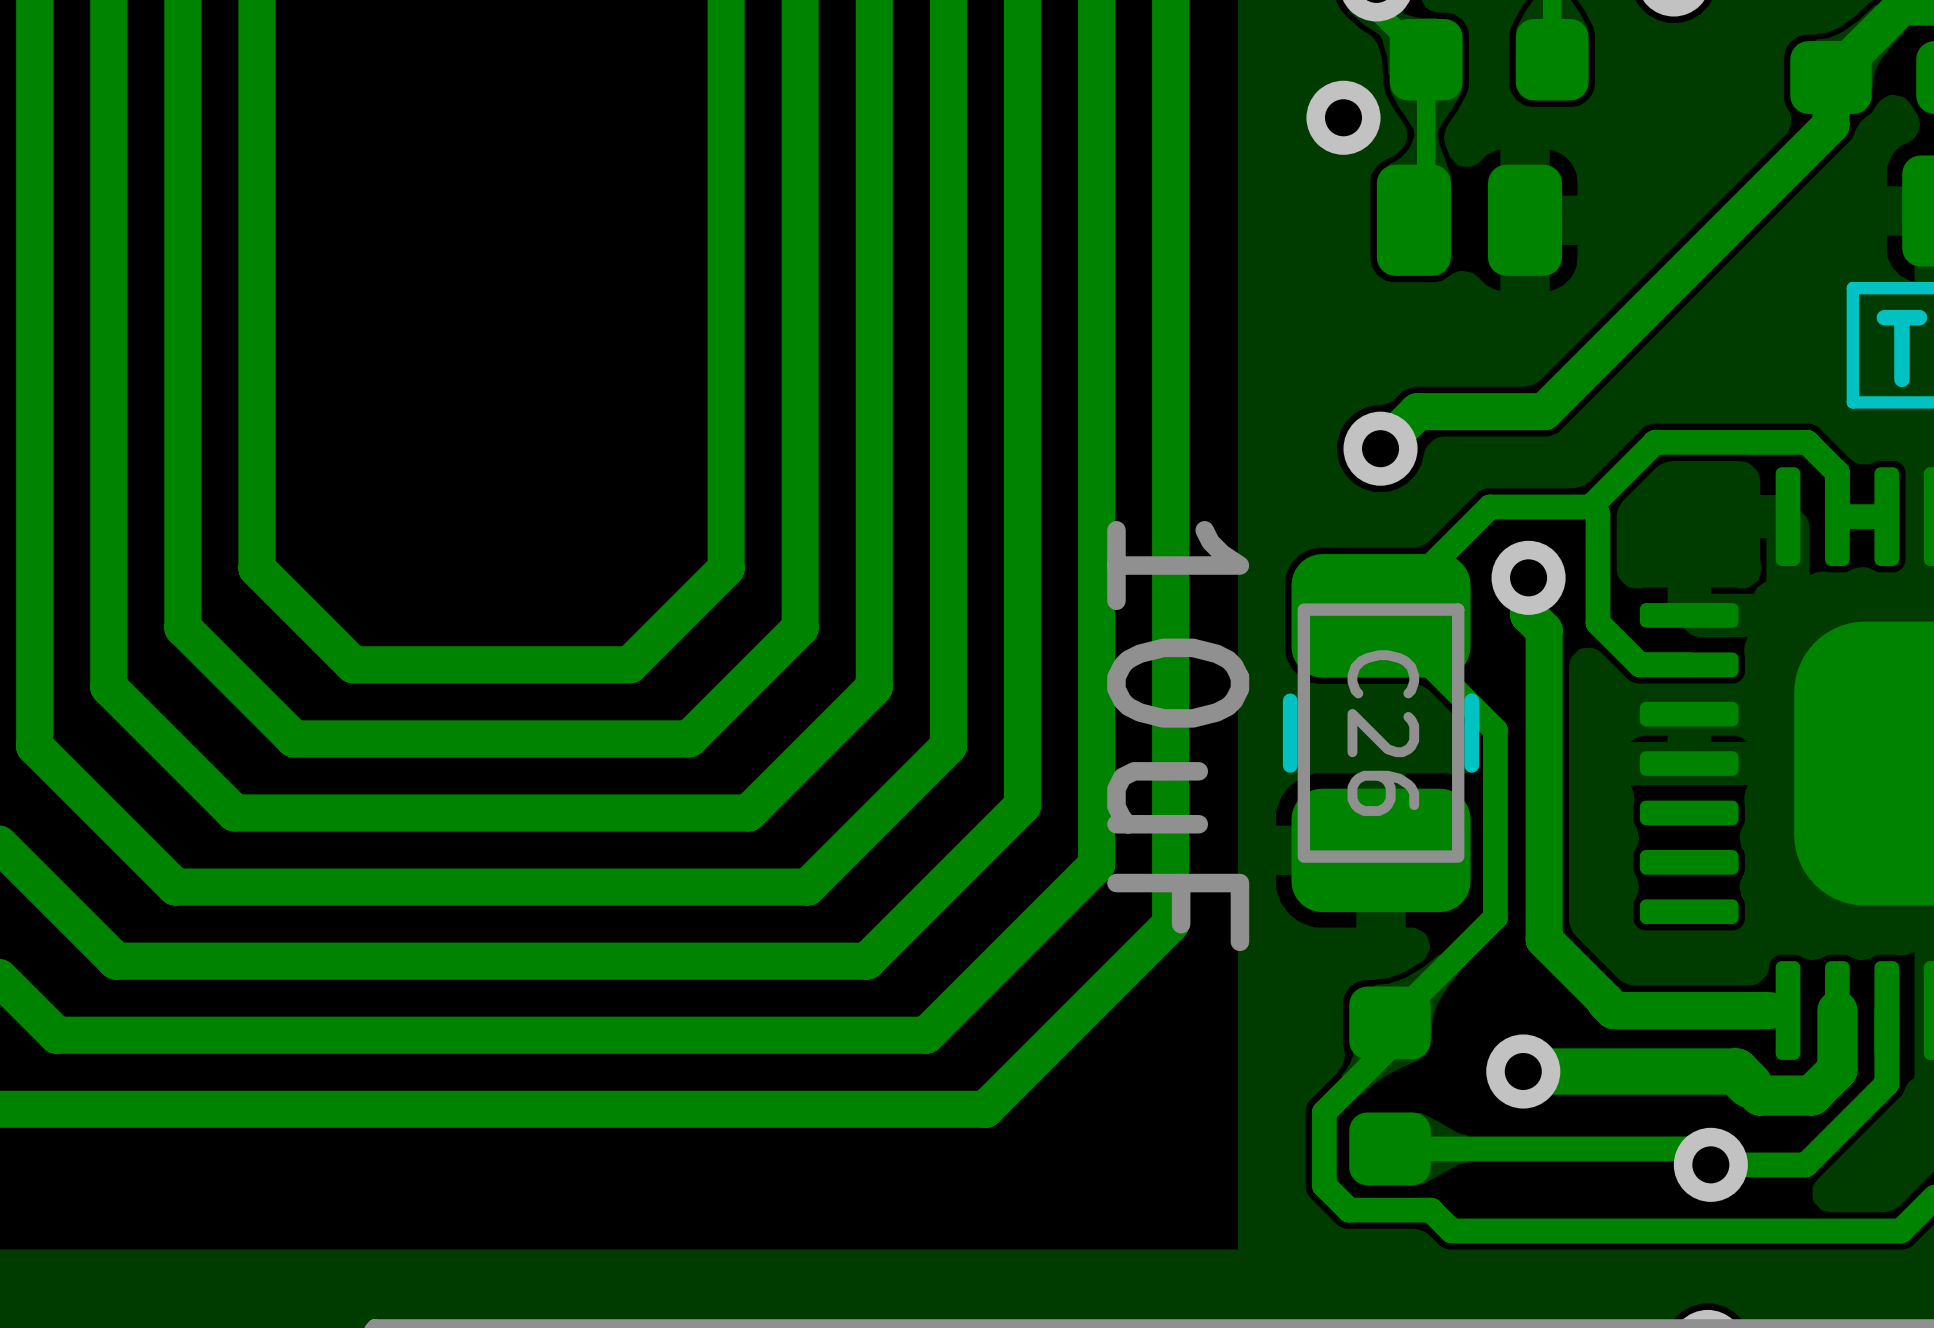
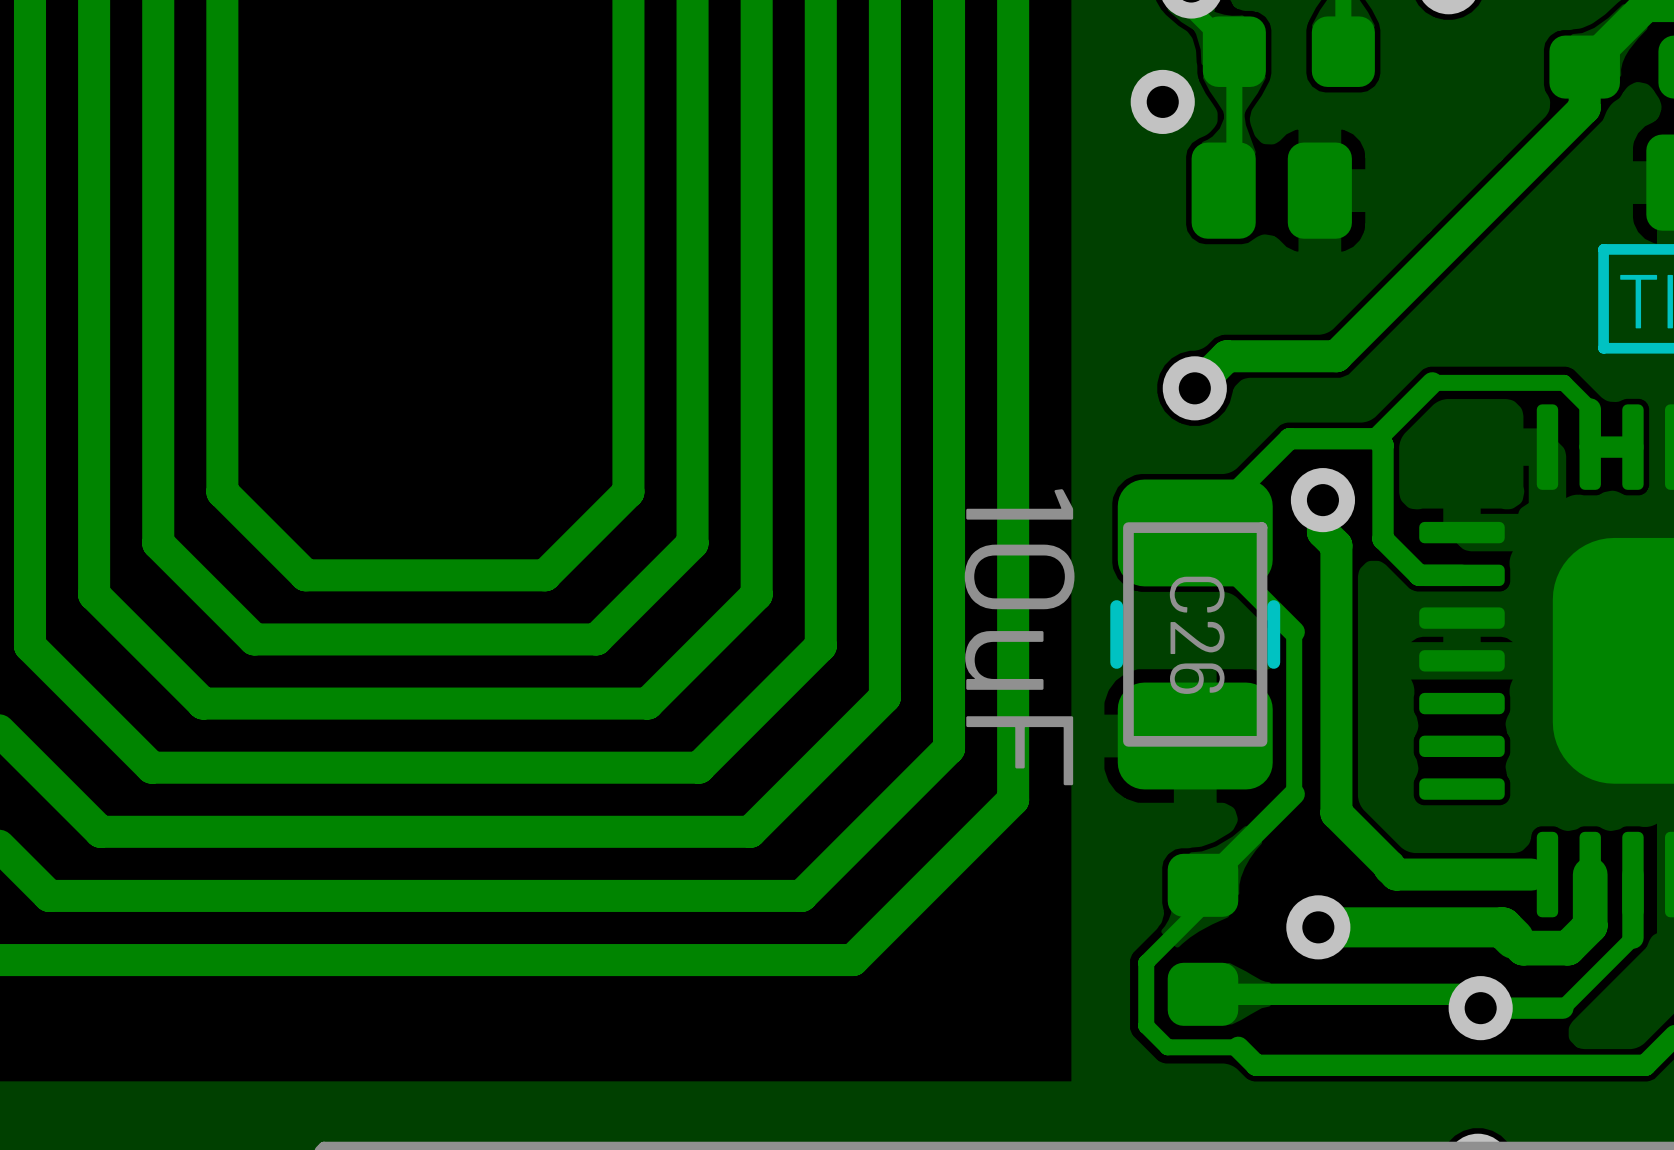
track width: thick (1655, 442) (1807, 442) (1837, 472) -> thin (1432, 382) (1564, 382) (1590, 409)
track width: thick (1495, 730) (1495, 917) -> thin (1294, 631) (1294, 794)
track width: thick (1389, 1046) (1324, 1112) (1324, 1185) (1349, 1210) (1430, 1210) -> thin (1202, 905) (1146, 962) (1146, 1025) (1167, 1047) (1238, 1047)
track width: thick (1886, 1083) (1805, 1164) -> thin (1632, 938) (1562, 1008)

